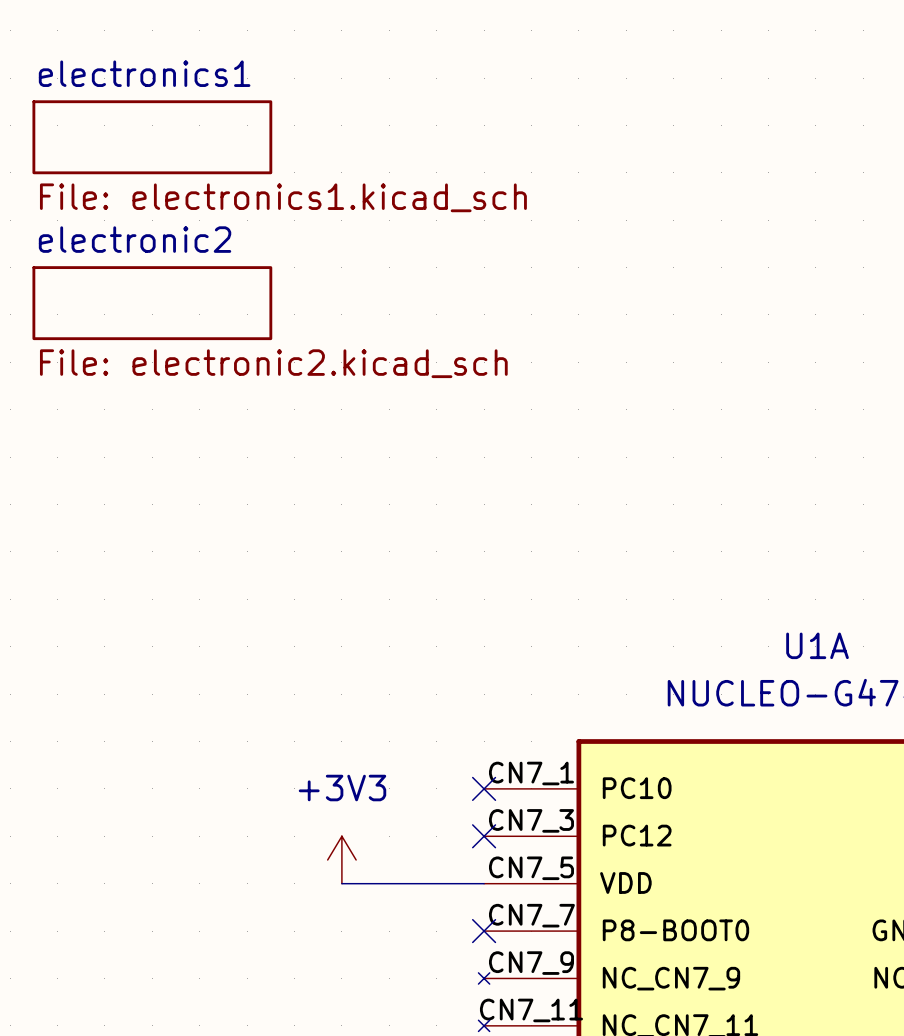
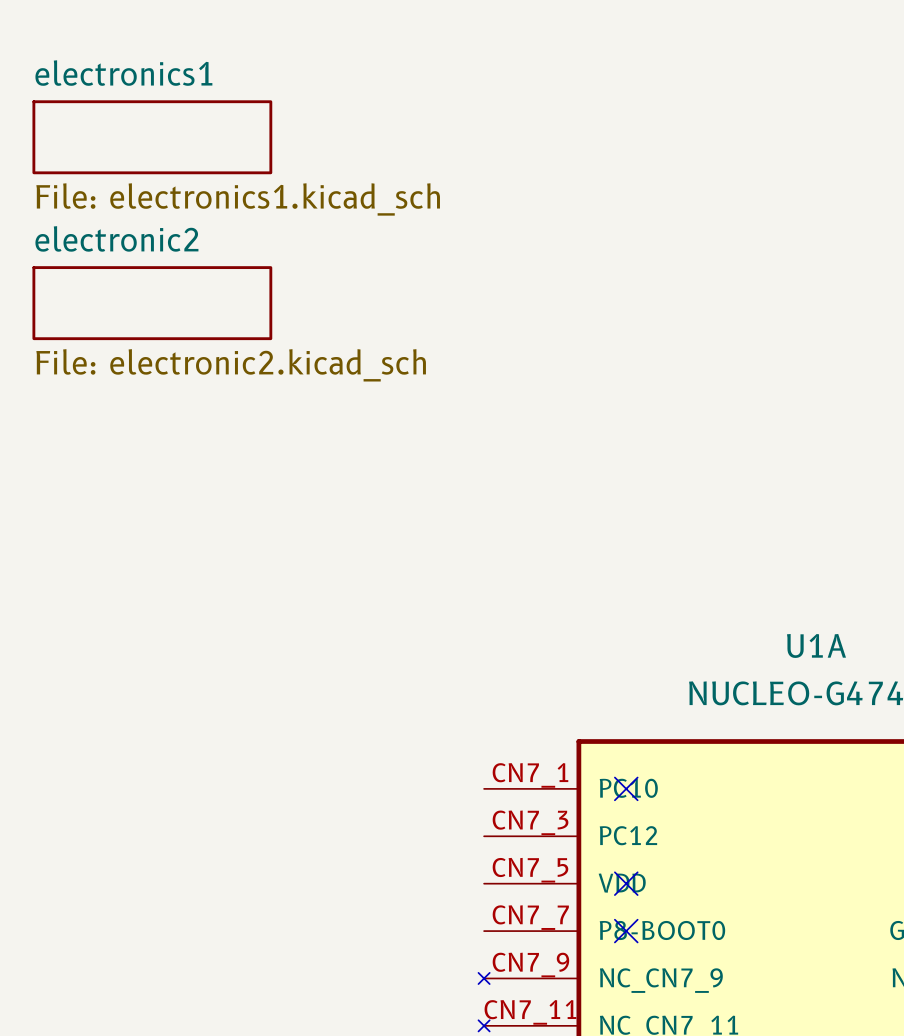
no-connect mark: (484, 788) -> none
no-connect mark: none -> (626, 788)
no-connect mark: (484, 836) -> none
power symbol: +3V3 (341, 859) -> none
wire: (341, 883) (484, 883) -> none
no-connect mark: none -> (626, 883)
no-connect mark: (484, 931) -> none
no-connect mark: none -> (626, 931)

